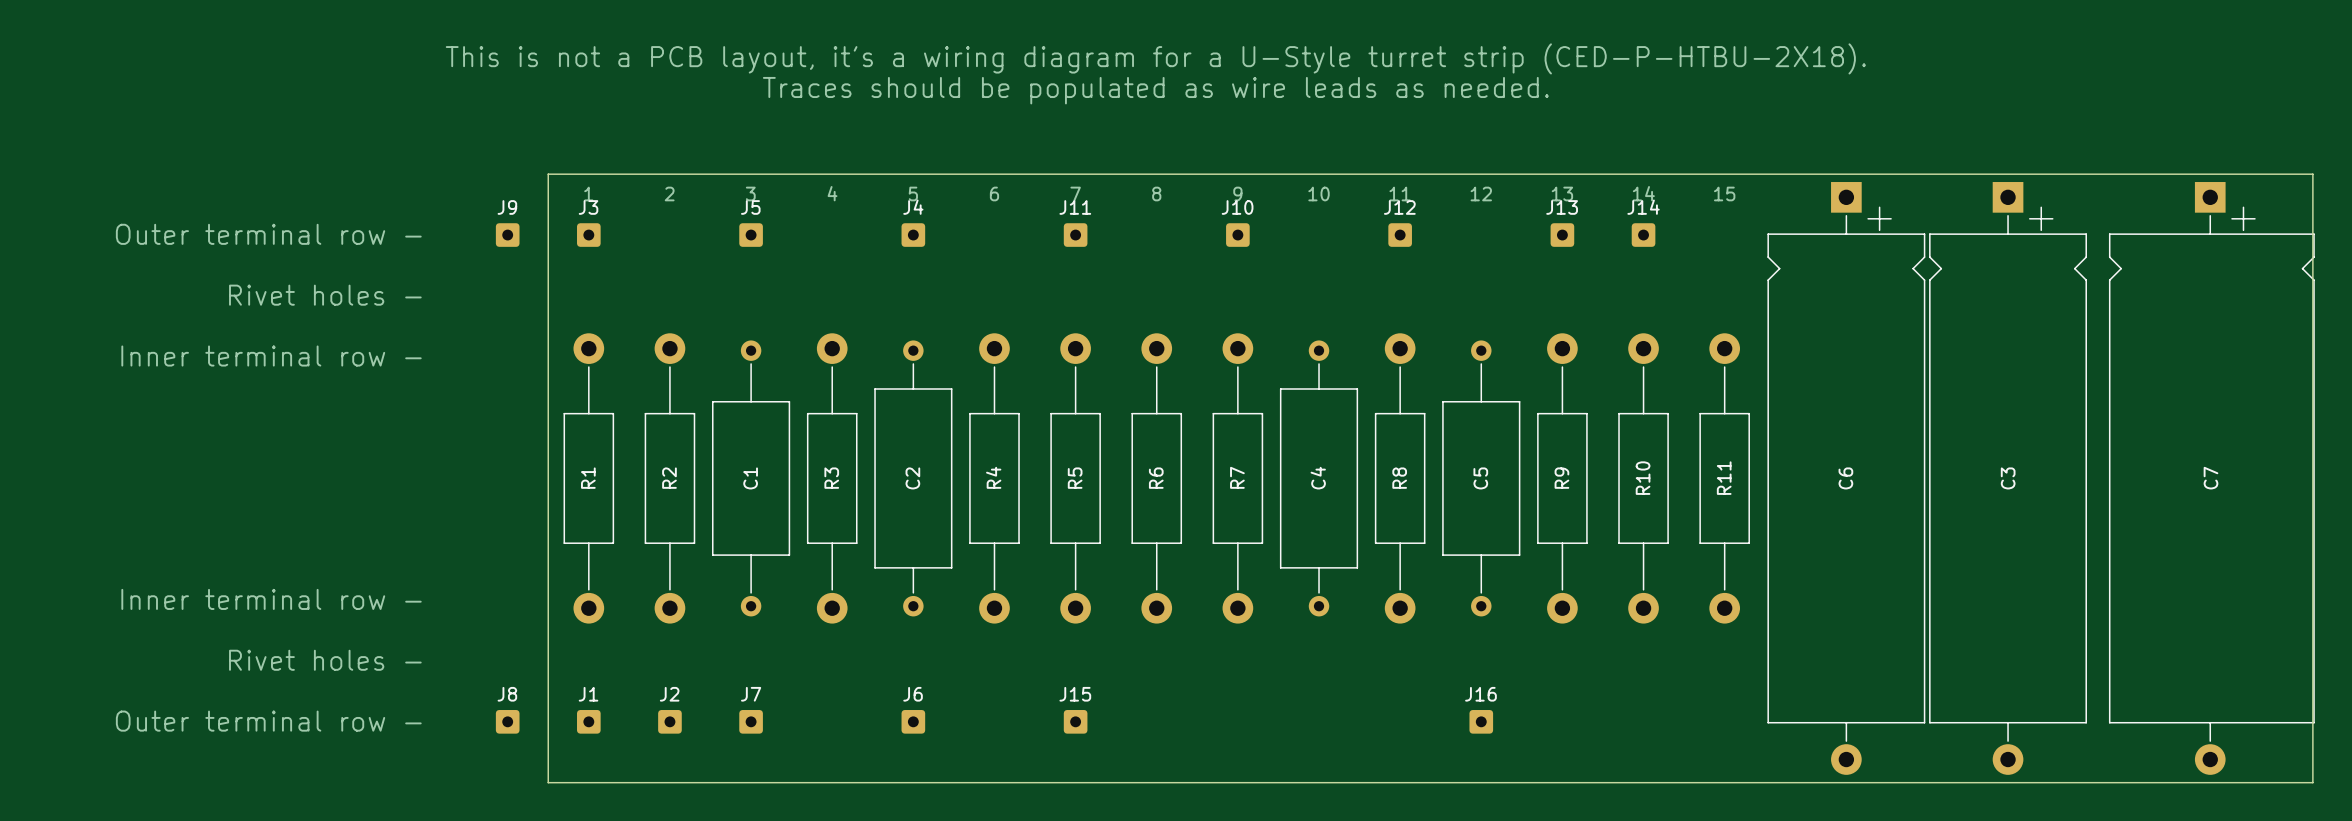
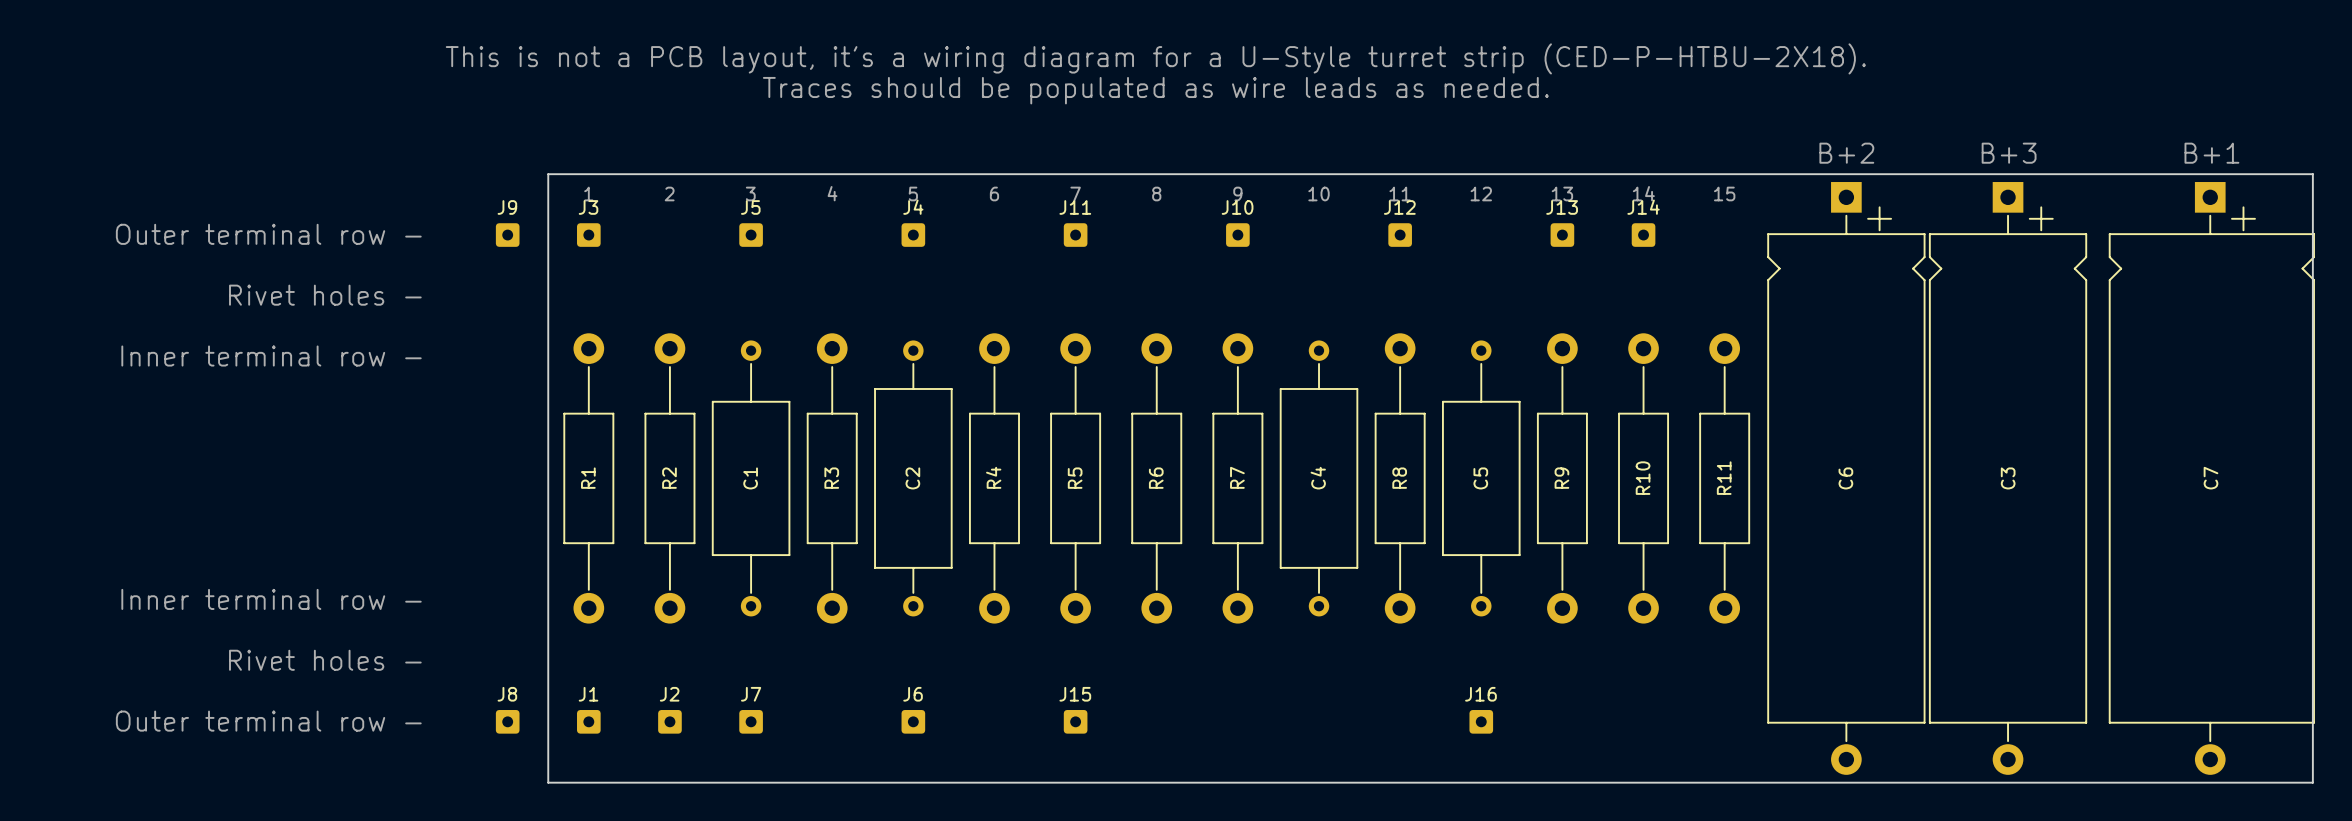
text: none -> B+2 (1846, 153)
text: none -> B+3 (2009, 153)
text: none -> B+1 (2211, 153)

